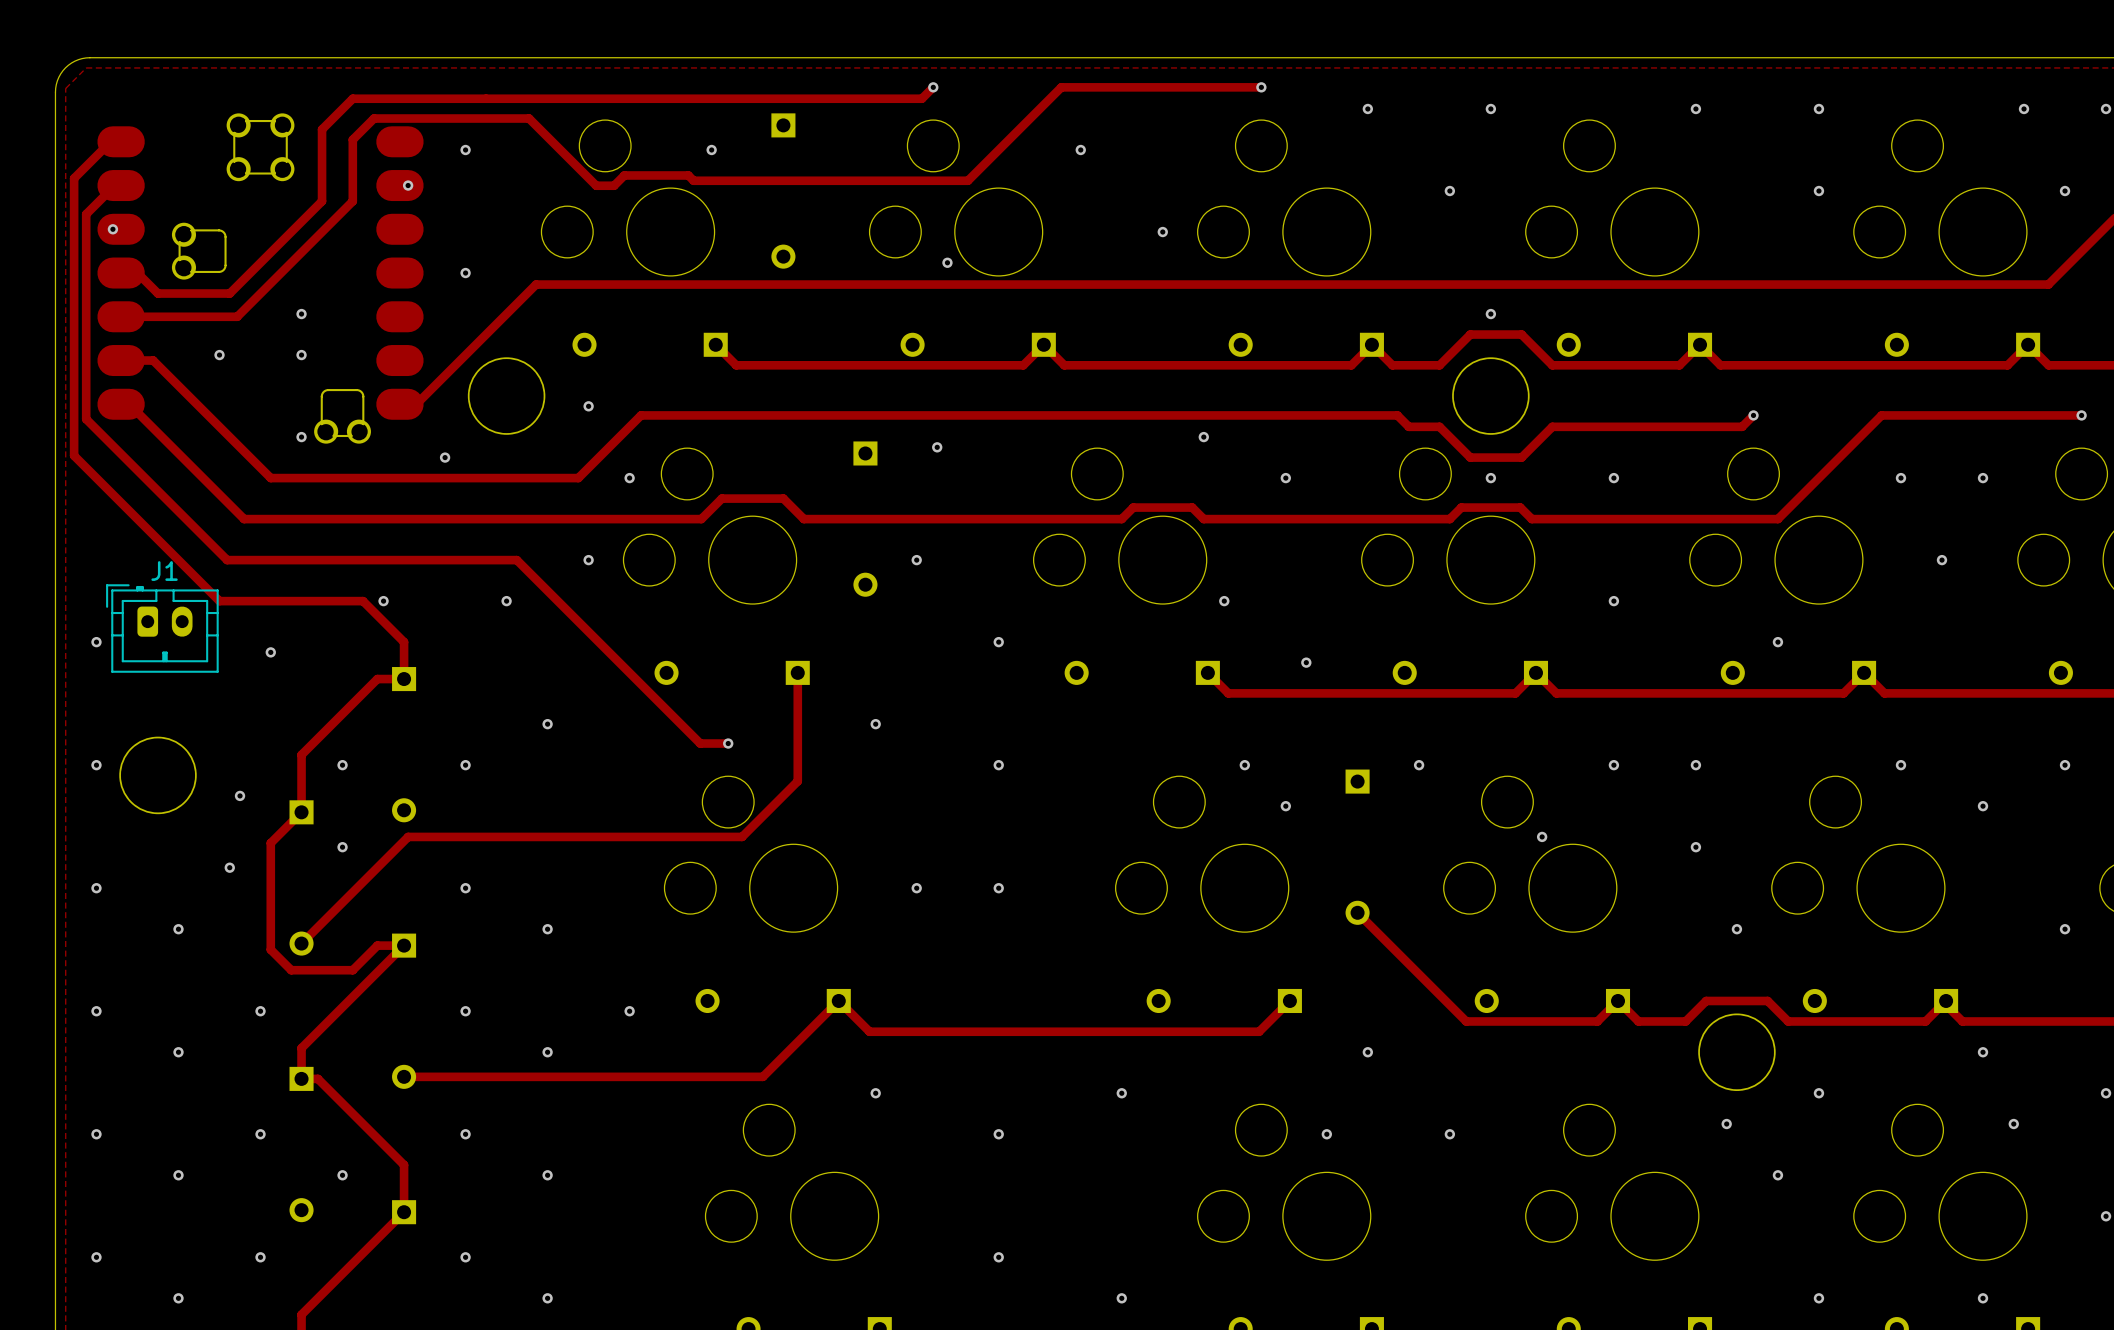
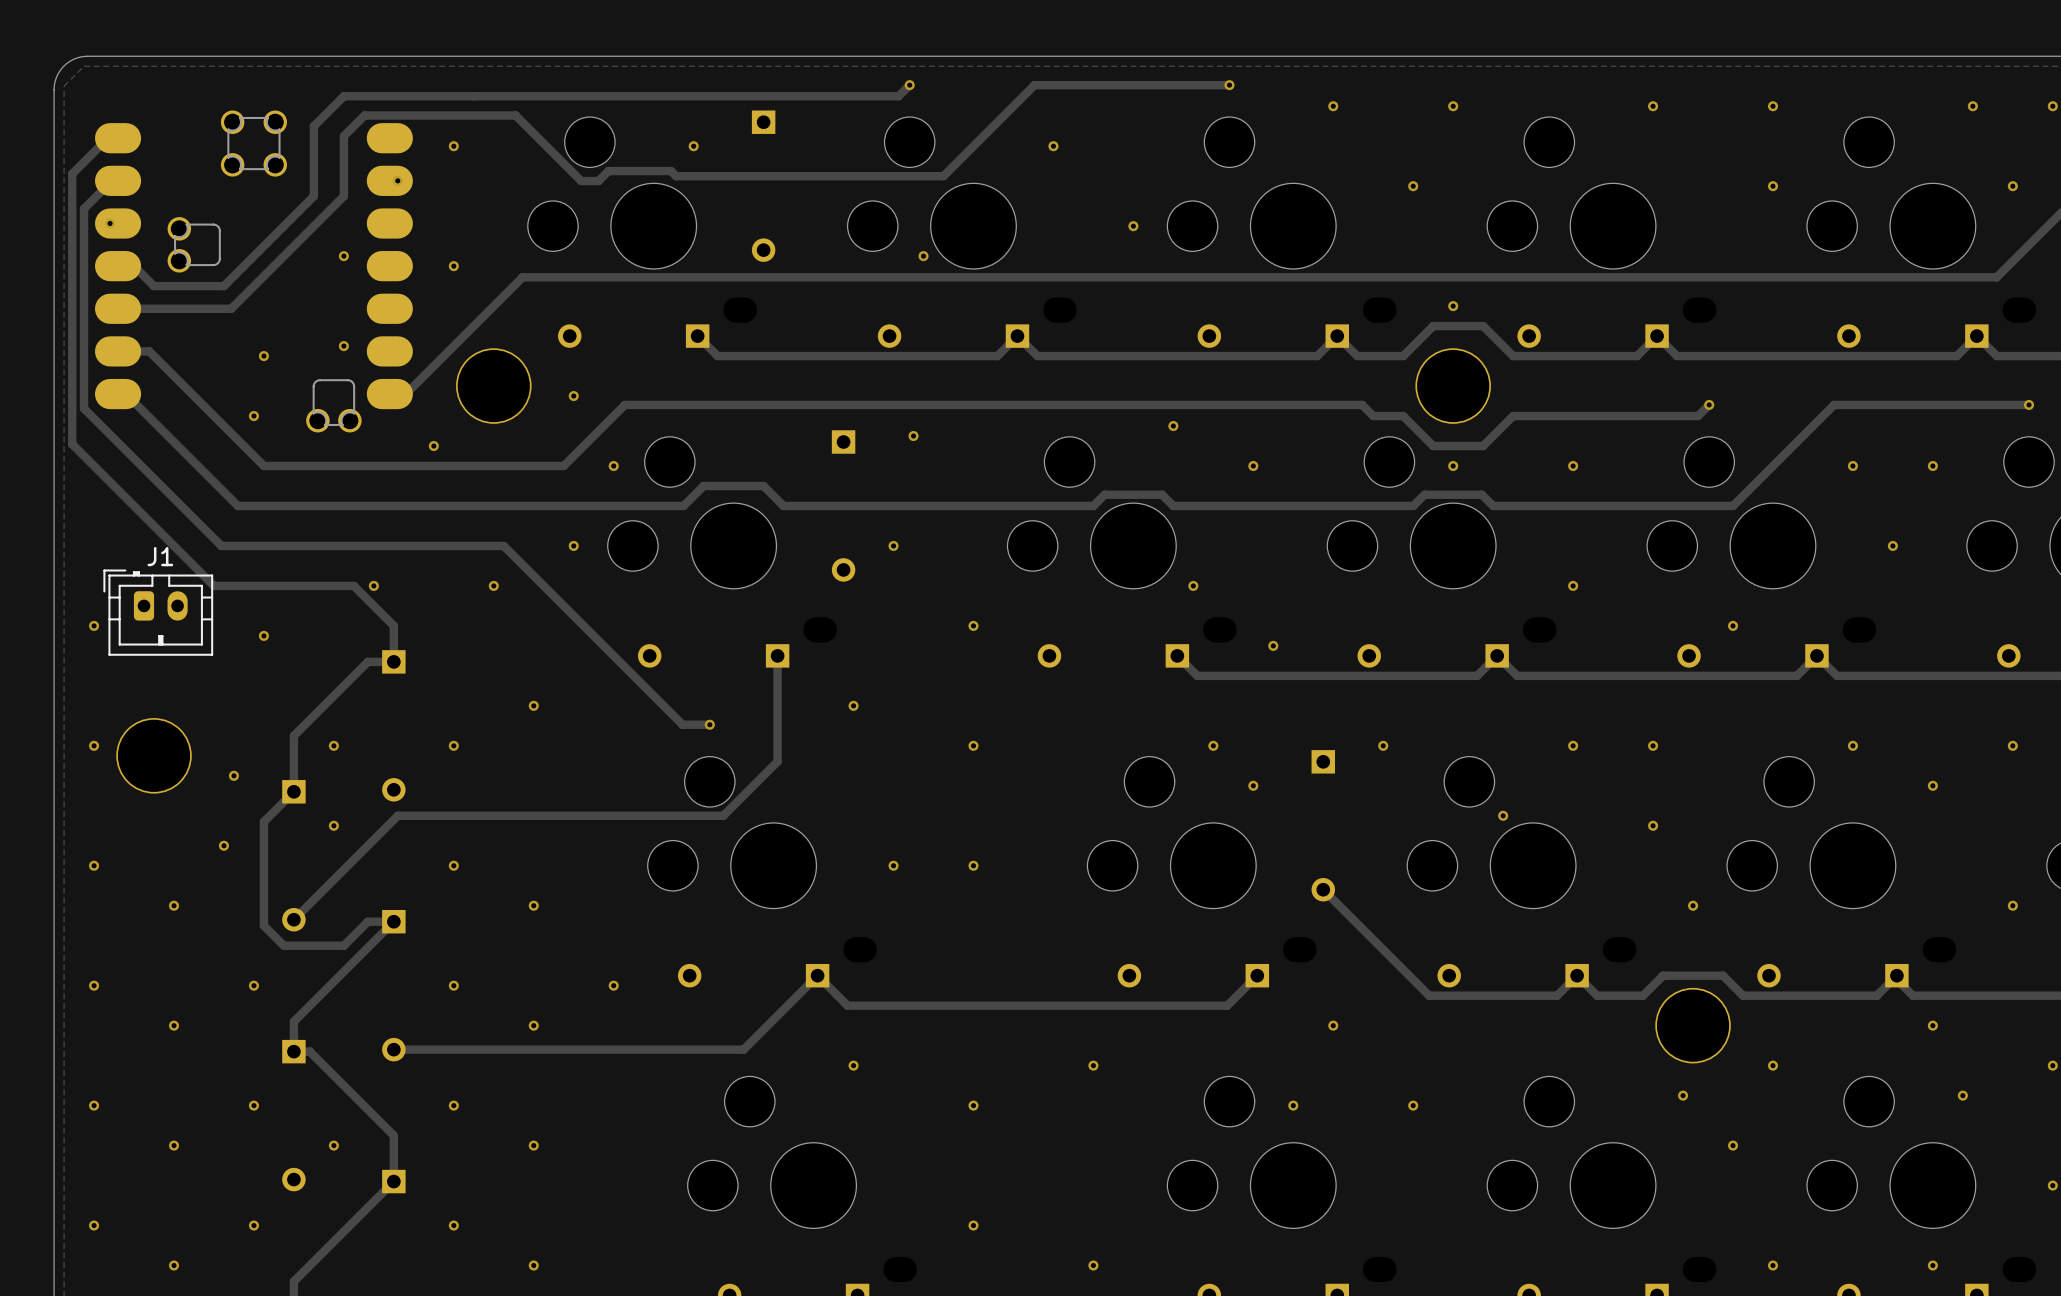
via: none -> (343, 256)
via: (301, 314) -> none
via: (219, 355) -> none
via: (301, 355) -> none
via: none -> (343, 346)
via: none -> (263, 356)
via: none -> (253, 416)
via: (301, 437) -> none

